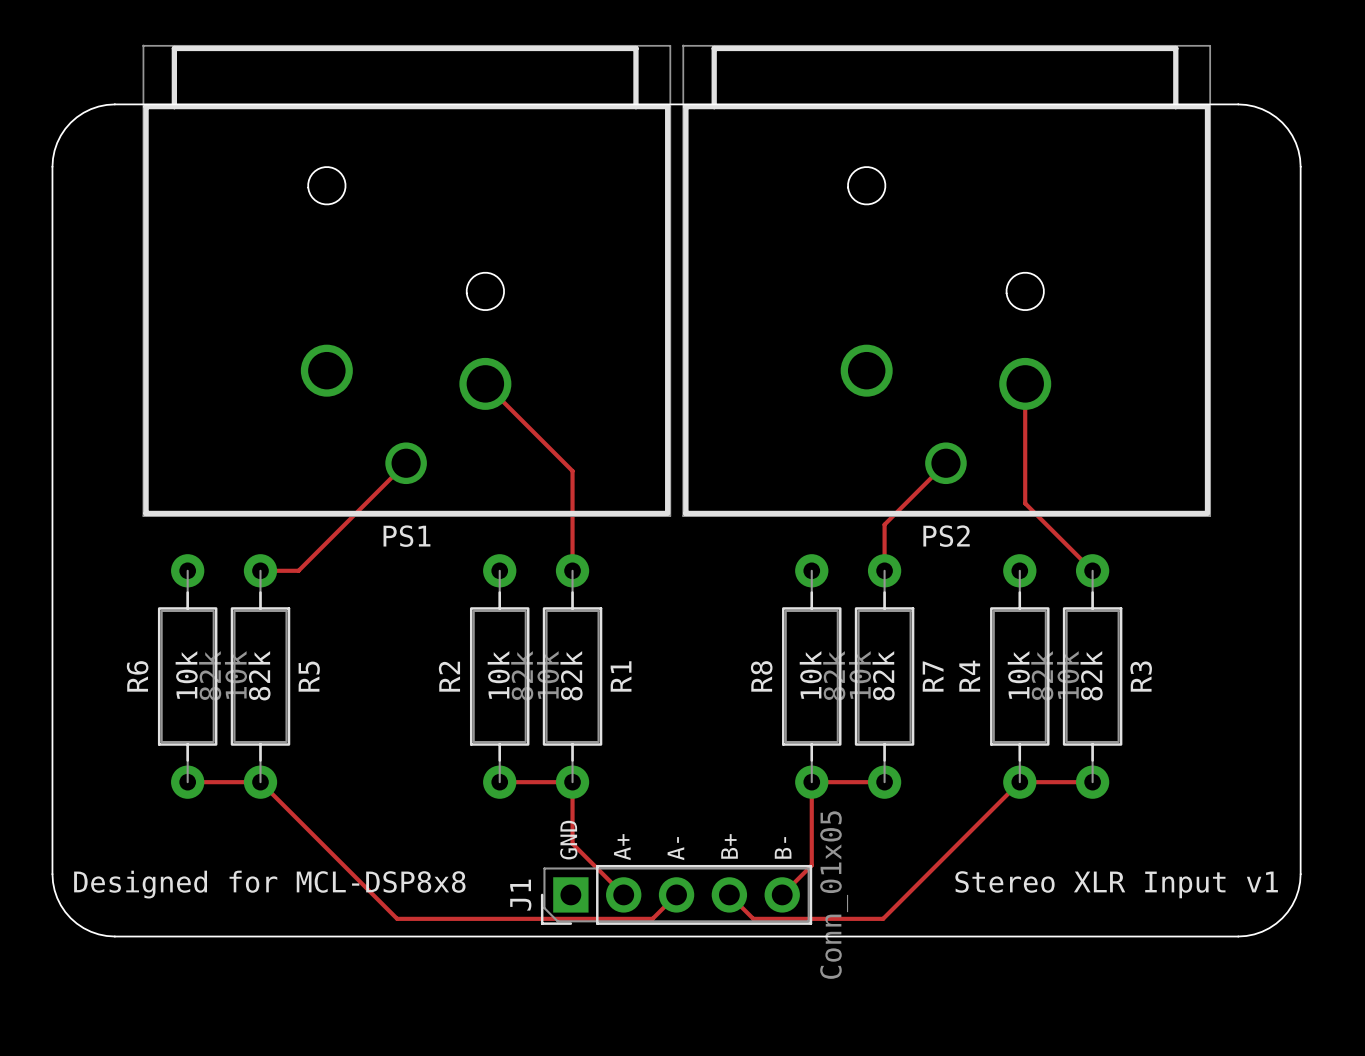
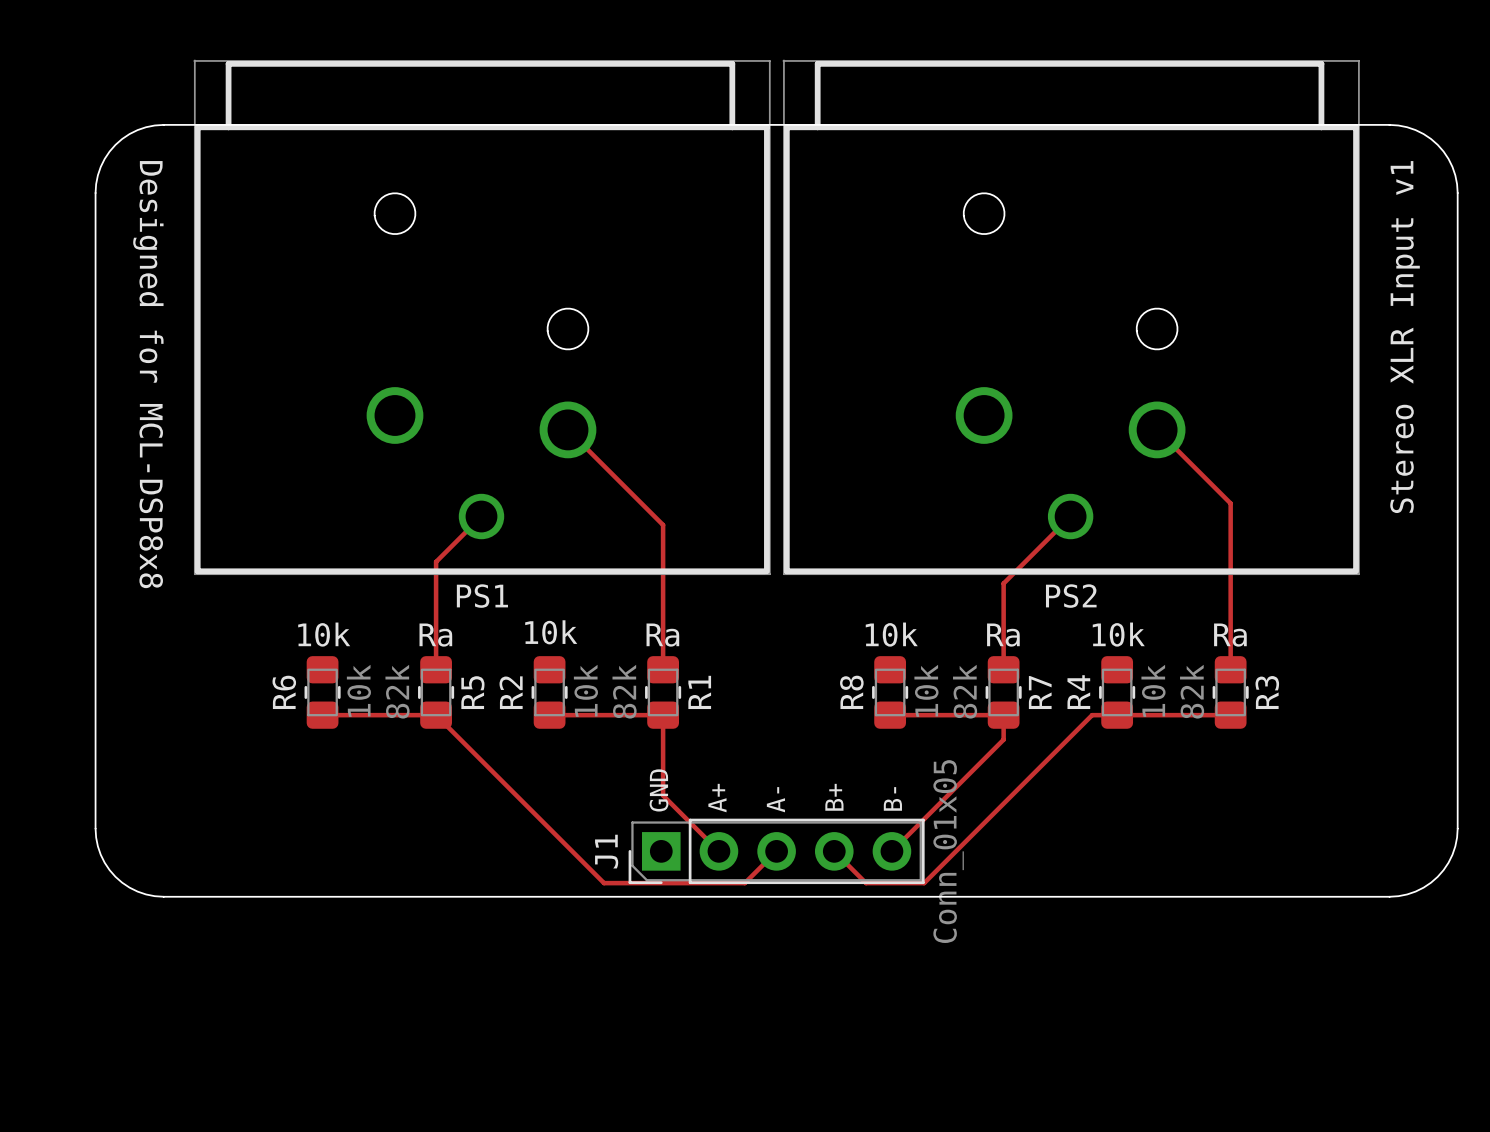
text: none -> Stereo XLR Input v1 (1405, 337)
text: none -> Designed for MCL-DSP8x8 (148, 374)
top track: (1025, 383) (1025, 503) (1092, 570) -> (1157, 429) (1230, 503) (1230, 669)
top track: (364, 504) (298, 570) (260, 570) -> (436, 561) (436, 669)
R6 footprint: [157, 554, 218, 799] -> [304, 656, 341, 729]
R5 footprint: [230, 554, 291, 799] -> [418, 656, 455, 729]
R2 footprint: [469, 554, 530, 799] -> [531, 656, 568, 729]
R1 footprint: [542, 554, 603, 799] -> [645, 656, 682, 729]
R8 footprint: [782, 554, 842, 799] -> [872, 656, 909, 729]
R7 footprint: [854, 554, 915, 799] -> [985, 656, 1022, 729]
R4 footprint: [990, 554, 1050, 799] -> [1099, 656, 1136, 729]
R3 footprint: [1062, 554, 1123, 799] -> [1212, 656, 1249, 729]
top track: none -> (663, 633) (663, 669)
top track: none -> (1003, 633) (1003, 669)
text: none -> Ra (435, 635)
text: none -> Ra (662, 635)
text: none -> 10k (891, 634)
text: none -> Ra (1003, 635)
text: none -> 10k (1118, 634)
text: none -> Ra (1230, 635)
top track: none -> (322, 715) (436, 715) (604, 883) (744, 883) (776, 851)
top track: none -> (549, 715) (663, 715) (663, 795) (718, 851)
top track: none -> (890, 715) (1003, 715) (1003, 739) (891, 851)
top track: none -> (1230, 715) (1092, 715) (924, 883) (866, 883) (834, 851)
text rotation: 0° (186, 674) -> 90° clockwise (324, 634)
text position: 10k (186, 674) -> 10k (324, 634)
text rotation: 0° (498, 674) -> 90° clockwise (551, 632)
text position: 10k (498, 674) -> 10k (551, 632)
text: 10k (810, 674) -> none
text: 10k (1018, 674) -> none
text: 82k (259, 675) -> none
text: 82k (571, 675) -> none
text: 82k (883, 675) -> none
text: 82k (1091, 675) -> none
board edge: (52, 749) (52, 874) (54, 890) (60, 905) (76, 923) (98, 934) (114, 936) (1246, 935) (1262, 931) (1276, 923) (1287, 912) (1298, 890) (1300, 874) (1300, 749) -> (95, 828) (100, 854) (115, 876) (137, 891) (163, 896) (1389, 896) (1415, 891) (1437, 876) (1452, 854) (1457, 828)
top track: (187, 782) (260, 782) (397, 918) (652, 918) (676, 894) -> none
top track: (499, 782) (572, 782) (572, 843) (623, 894) -> none
top track: (884, 782) (811, 782) (811, 865) (782, 894) -> none
top track: (1092, 782) (1019, 782) (883, 918) (753, 918) (729, 894) -> none
text position: GND (568, 840) -> GND (658, 790)
text position: B+ (729, 846) -> B+ (834, 797)
text position: A+ (622, 847) -> A+ (717, 798)
text position: B- (783, 847) -> B- (892, 798)
text position: A- (675, 848) -> A- (775, 799)
text: Designed for MCL-DSP8x8 (269, 884) -> none
text: Stereo XLR Input v1 (1116, 884) -> none
J1 position: (676, 894) -> (776, 851)

